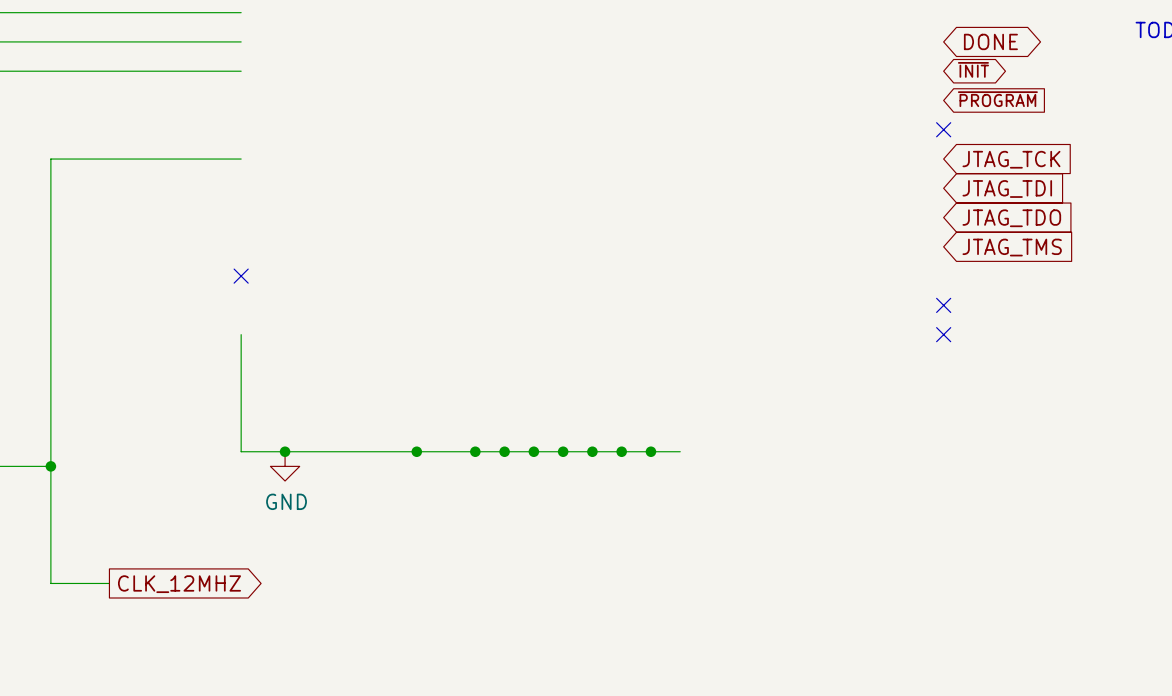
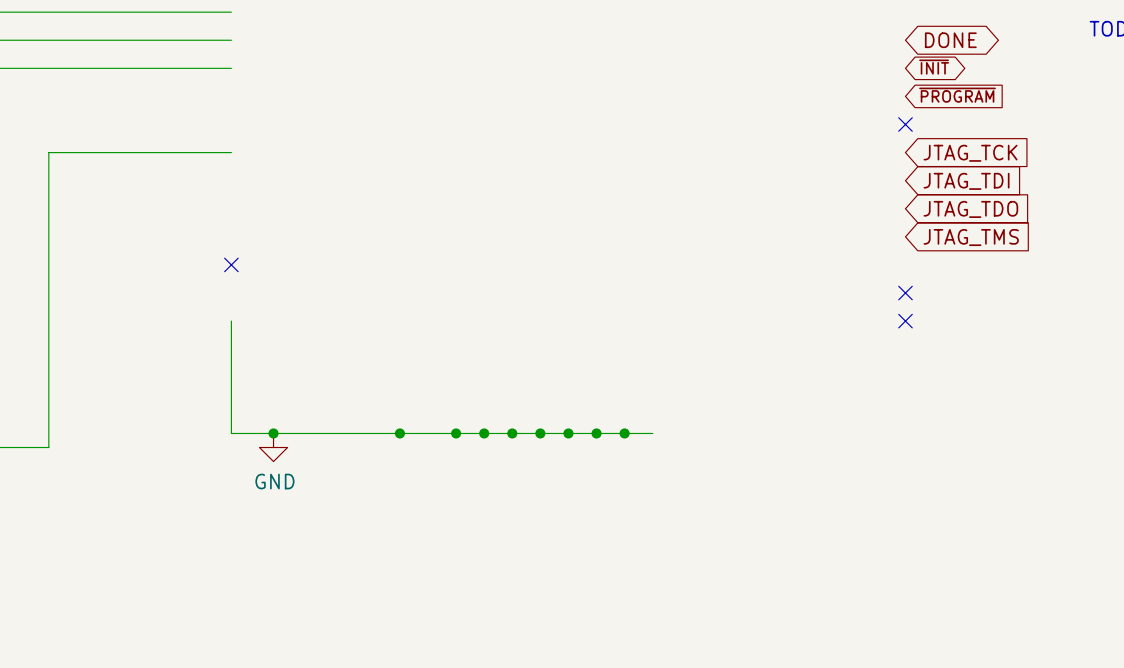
wire: (50, 466) (50, 583) (109, 583) -> none
junction: (50, 466) -> none
global label: CLK_12MHZ (179, 584) -> none

